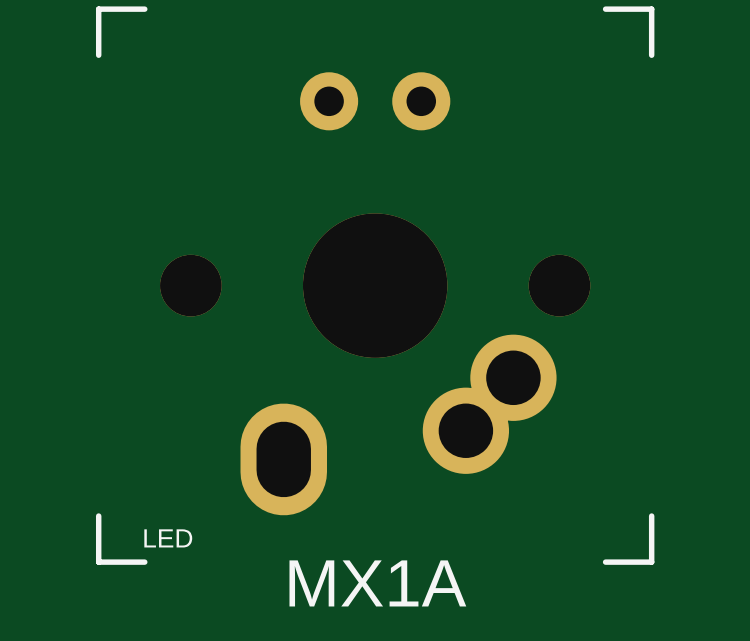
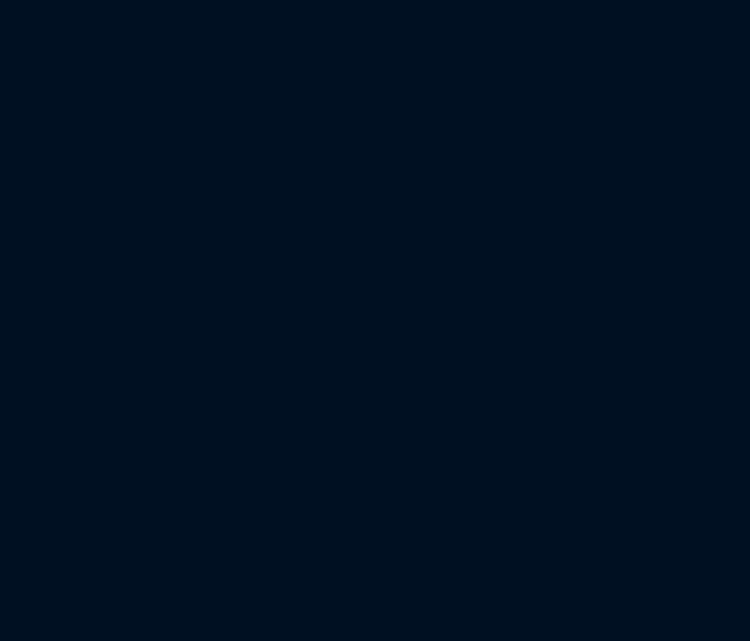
part: LED (375, 285) -> none
part: MX1A (375, 364) -> none

